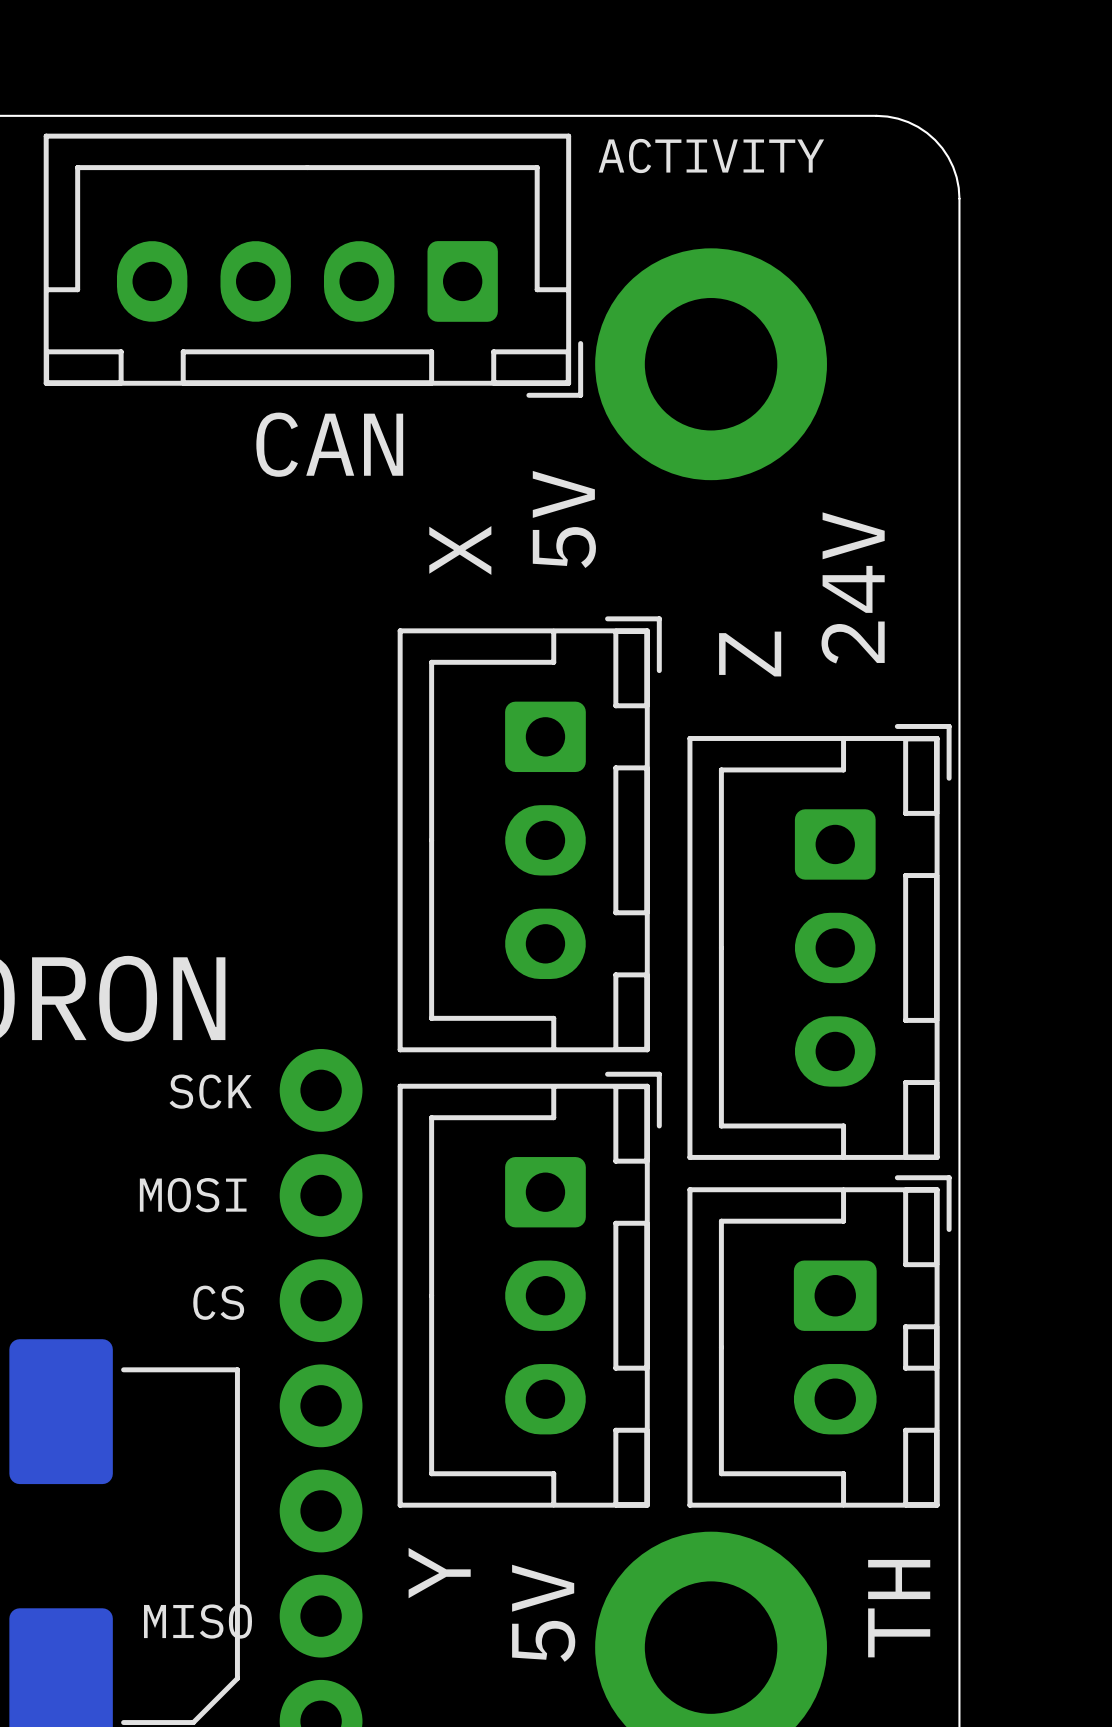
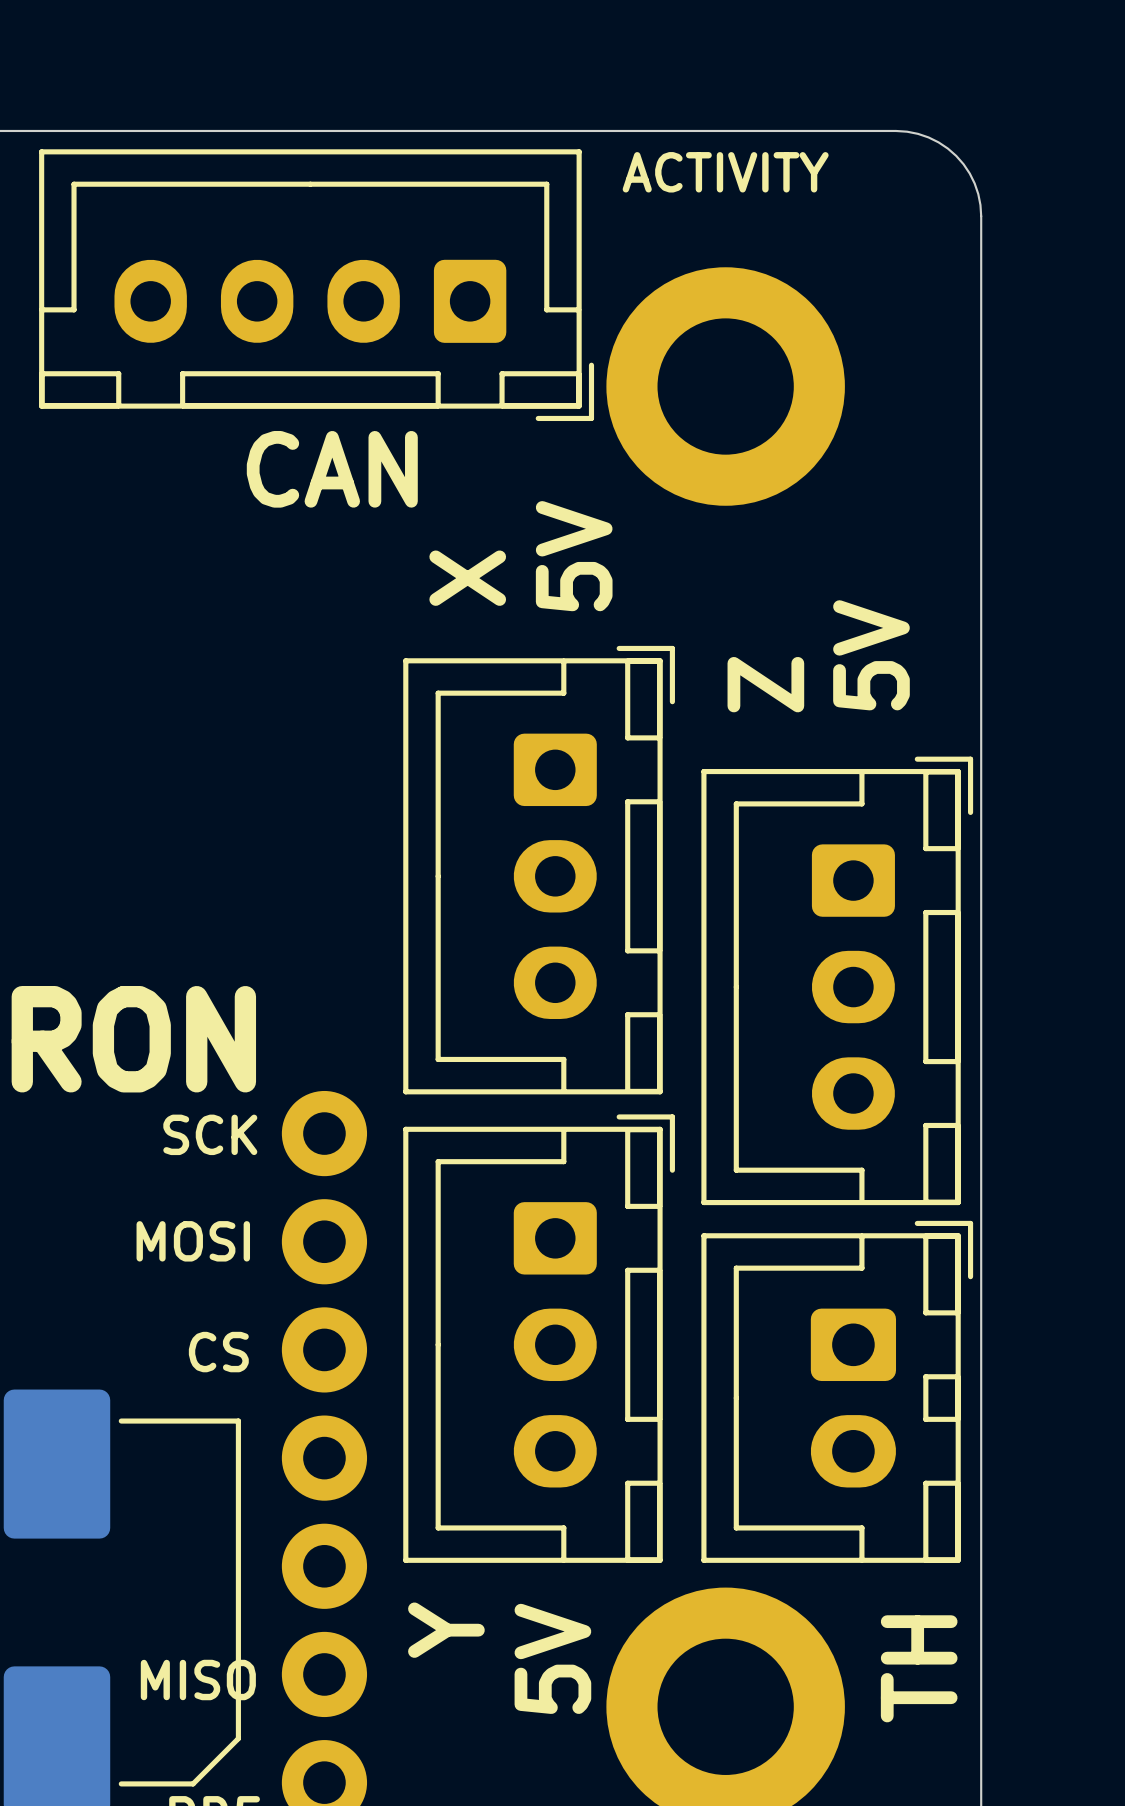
text: 24V (853, 587) -> none
text: none -> 5V (871, 655)

